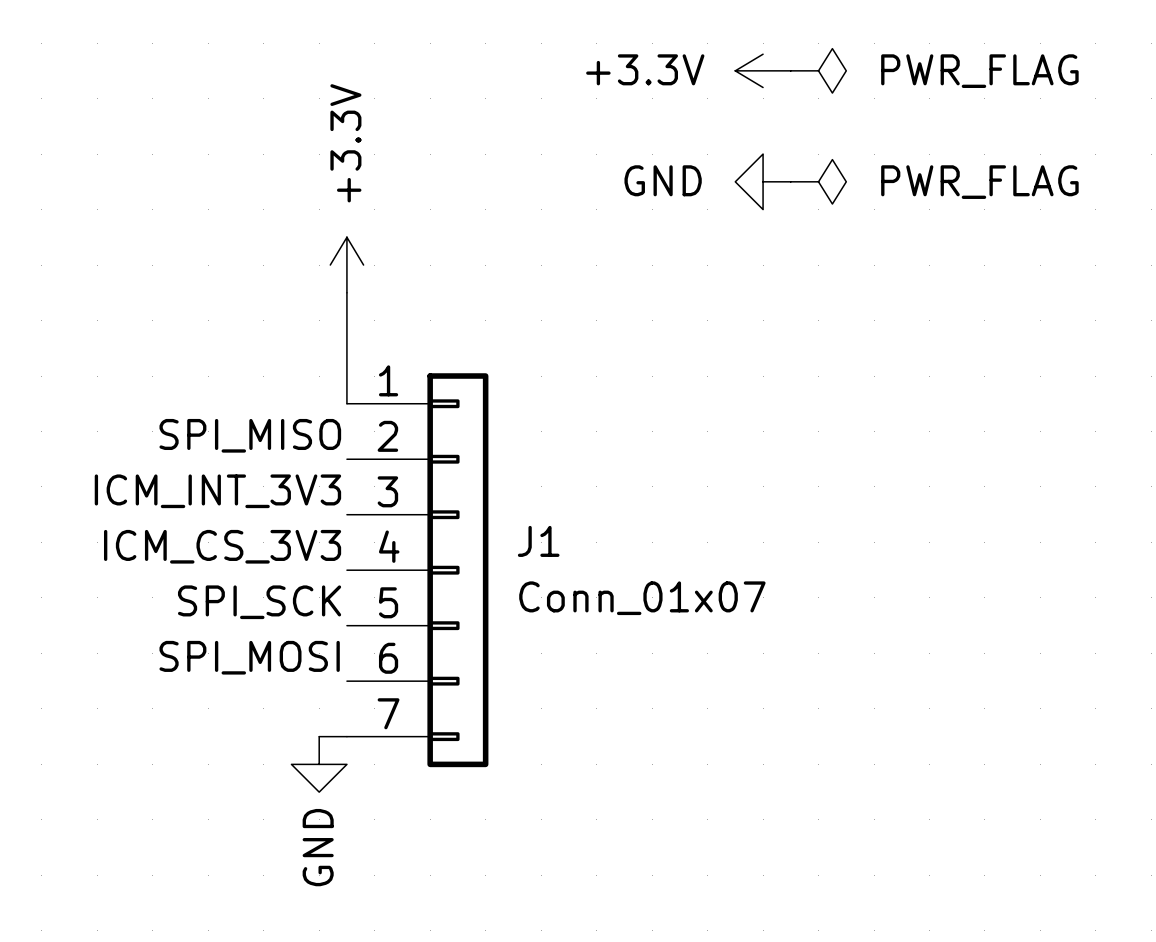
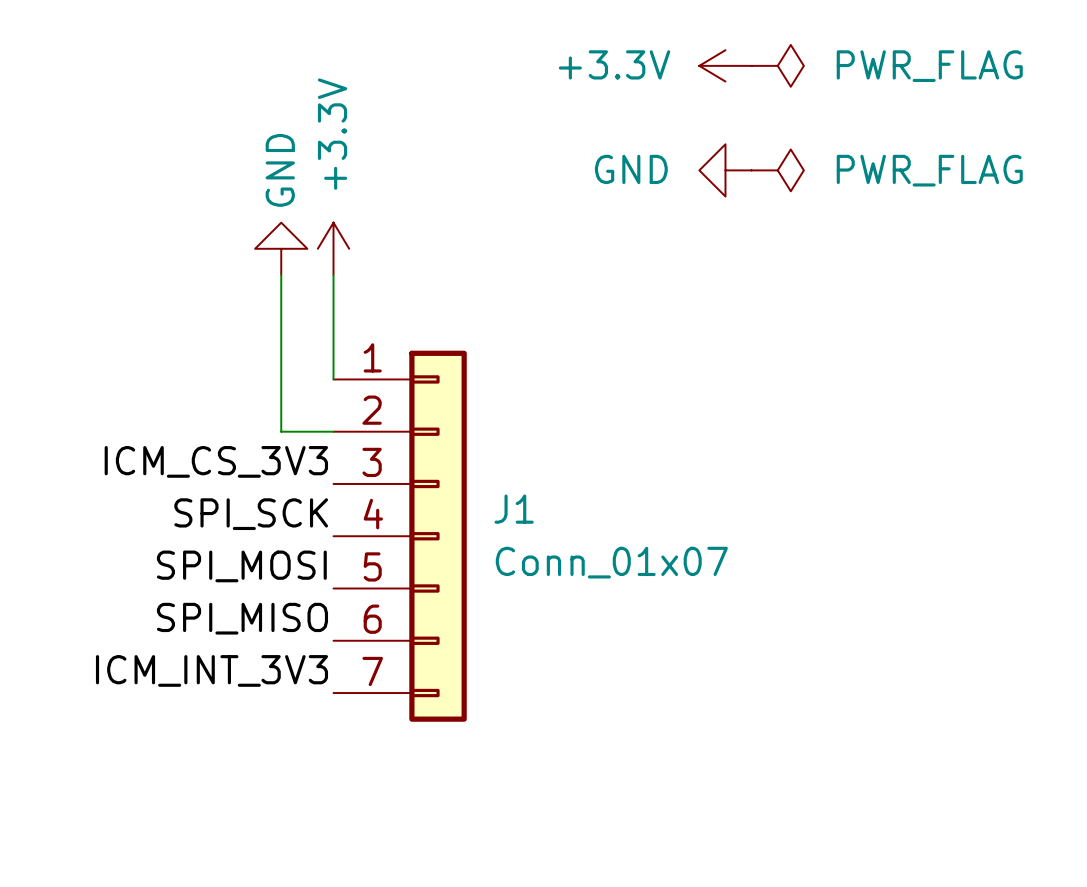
wire: none -> (281, 274) (281, 431) (333, 431)
label: SPI_MISO (250, 435) -> none
label: ICM_INT_3V3 (217, 491) -> ICM_CS_3V3 (216, 461)
label: ICM_CS_3V3 (222, 546) -> SPI_SCK (251, 514)
label: SPI_SCK (259, 602) -> SPI_MOSI (241, 566)
label: SPI_MOSI (249, 657) -> SPI_MISO (242, 618)
label: none -> ICM_INT_3V3 (211, 670)
wire: (319, 736) (346, 736) -> none
power symbol rotation: 0° (319, 764) -> 180° (281, 248)
power symbol position: GND (319, 764) -> GND (281, 248)

